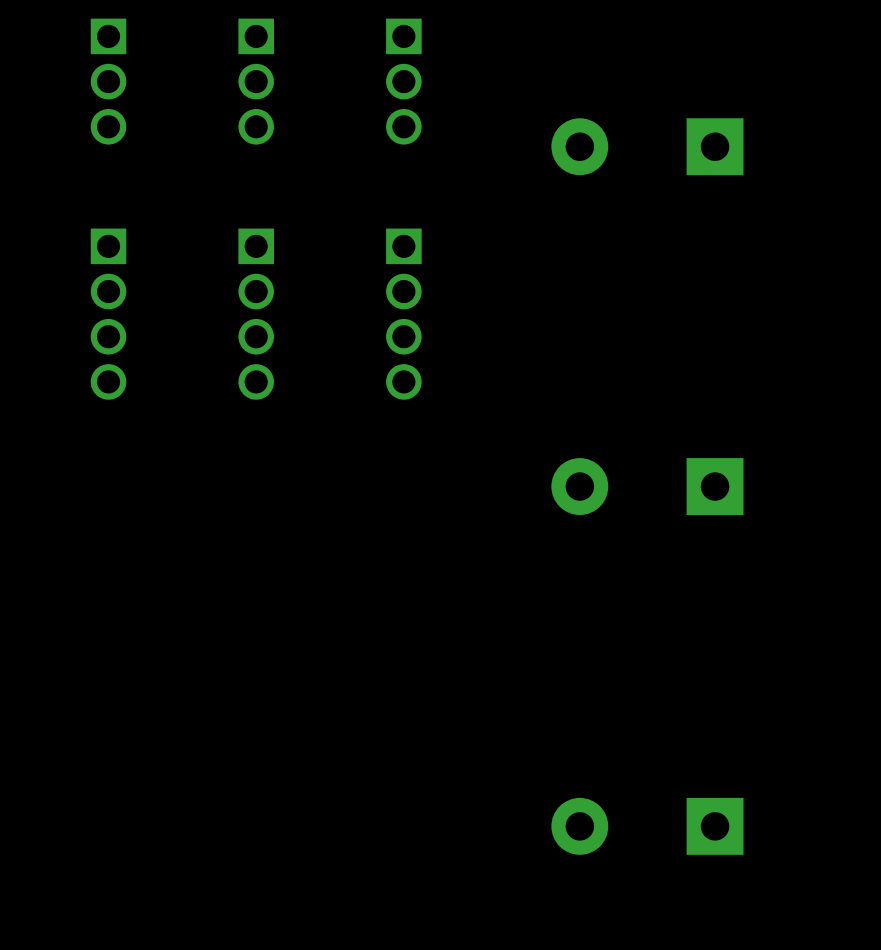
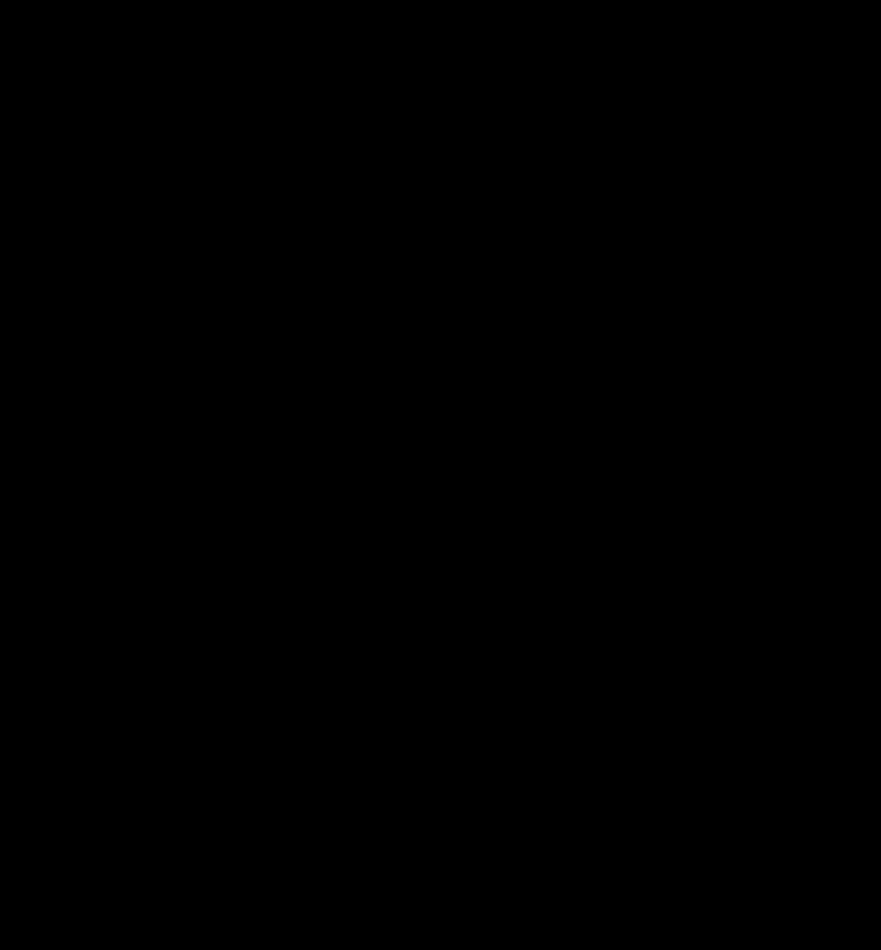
part: (108, 81) -> none
part: (256, 81) -> none
part: (403, 81) -> none
part: (647, 146) -> none
part: (108, 314) -> none
part: (256, 314) -> none
part: (403, 314) -> none
part: (647, 486) -> none
part: (647, 826) -> none

